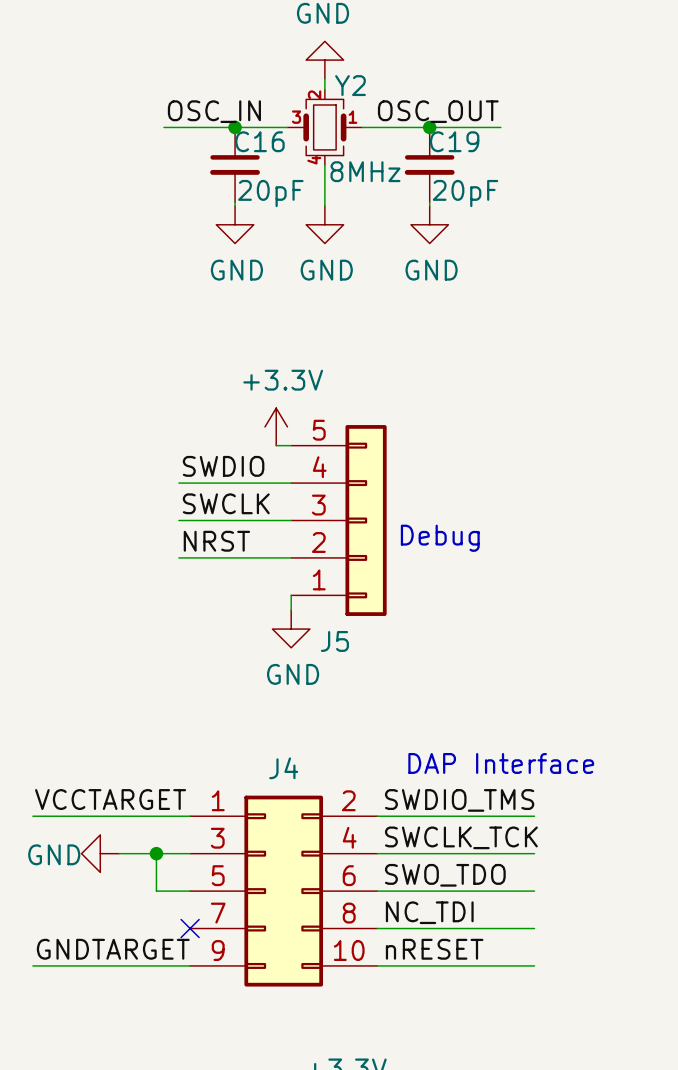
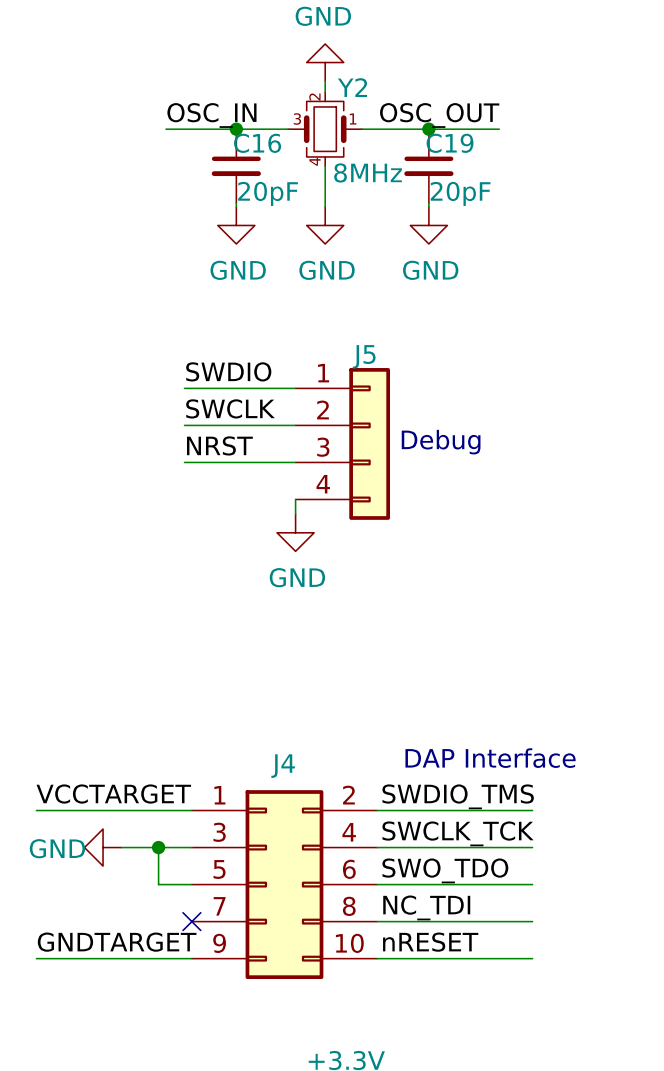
J5 symbol: [291, 425, 387, 616] -> [295, 368, 391, 520]
power symbol: +3.3V (276, 426) -> none
wire: (276, 445) (291, 445) -> none
label position: SWDIO (223, 466) -> SWDIO (228, 371)
wire: (178, 483) (291, 483) -> (184, 388) (295, 388)
label position: SWCLK (226, 503) -> SWCLK (230, 408)
wire: (178, 520) (291, 520) -> (184, 425) (295, 425)
text position: Debug (440, 538) -> Debug (441, 442)
label position: NRST (216, 541) -> NRST (219, 445)
wire: (178, 557) (291, 557) -> (184, 462) (295, 462)
wire: (291, 595) (291, 610) -> (295, 499) (295, 514)
power symbol position: GND (291, 629) -> GND (295, 532)
J5 name position: J5 (334, 641) -> J5 (364, 356)

